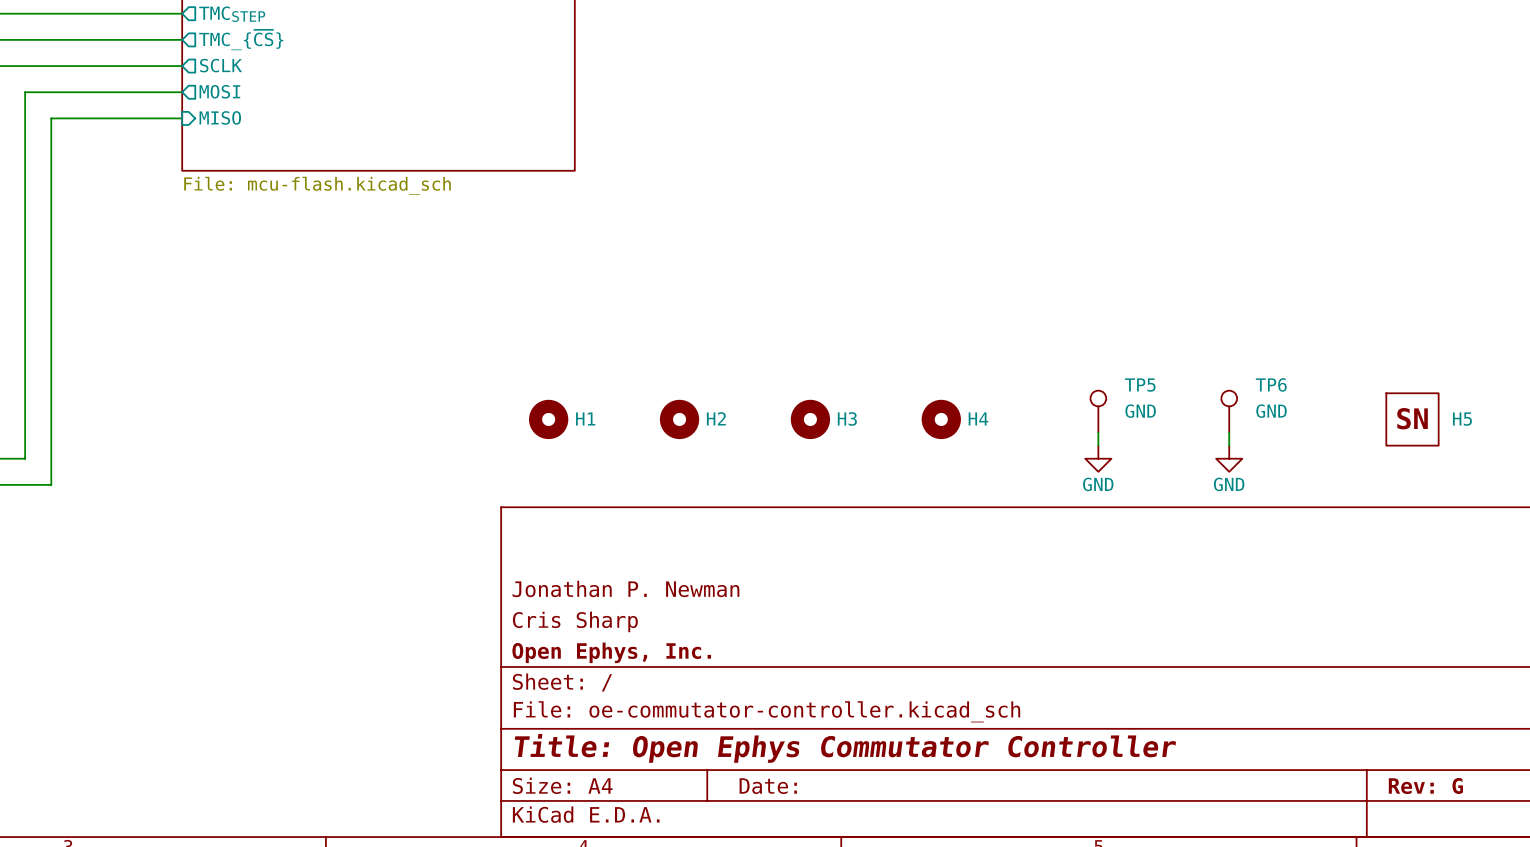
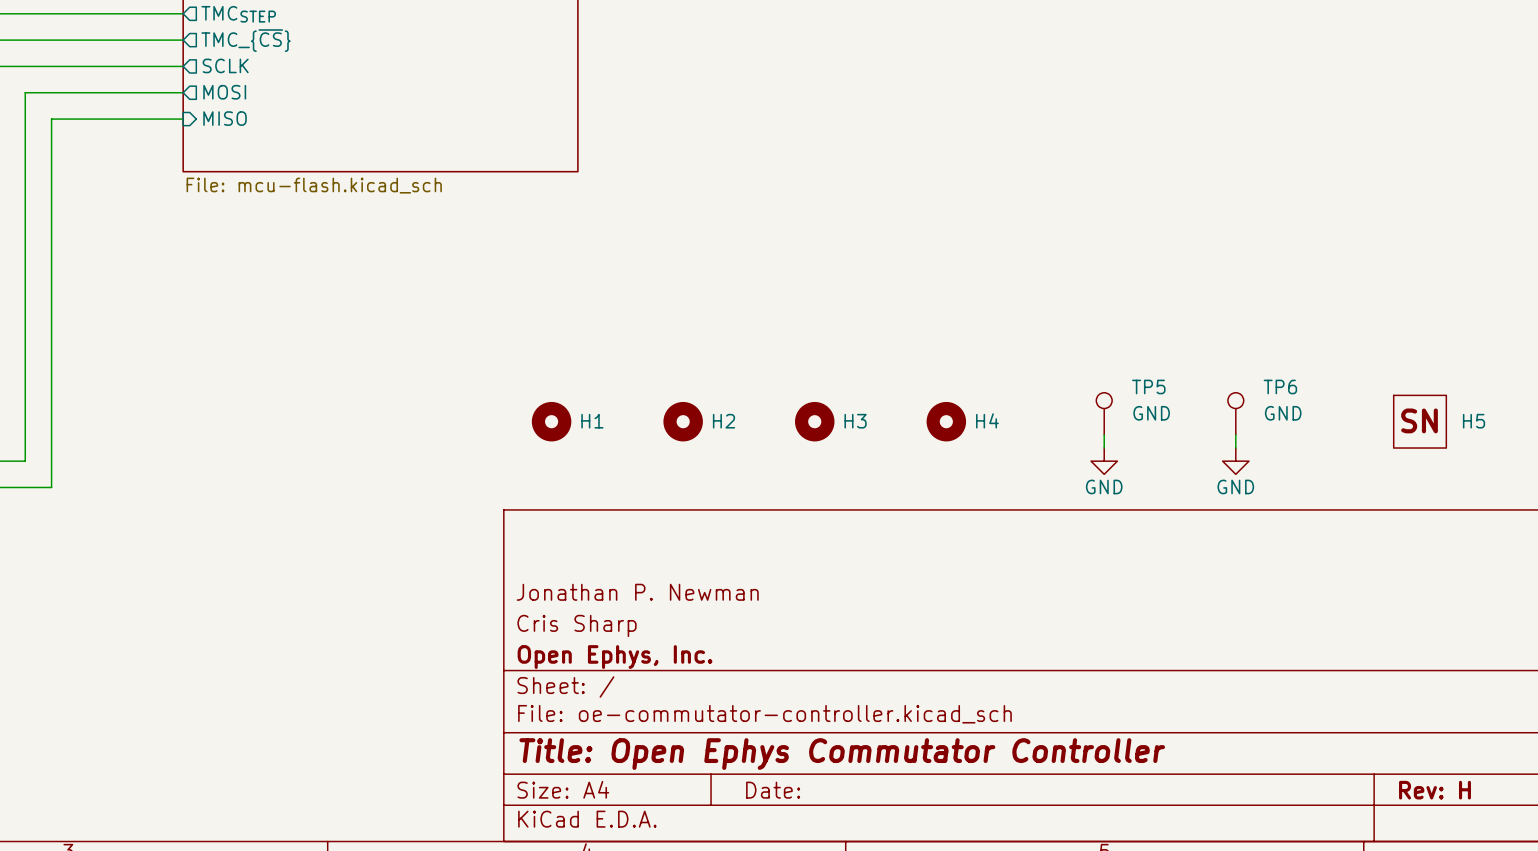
title block: Rev: G (1425, 785) -> Rev: H (1435, 790)

